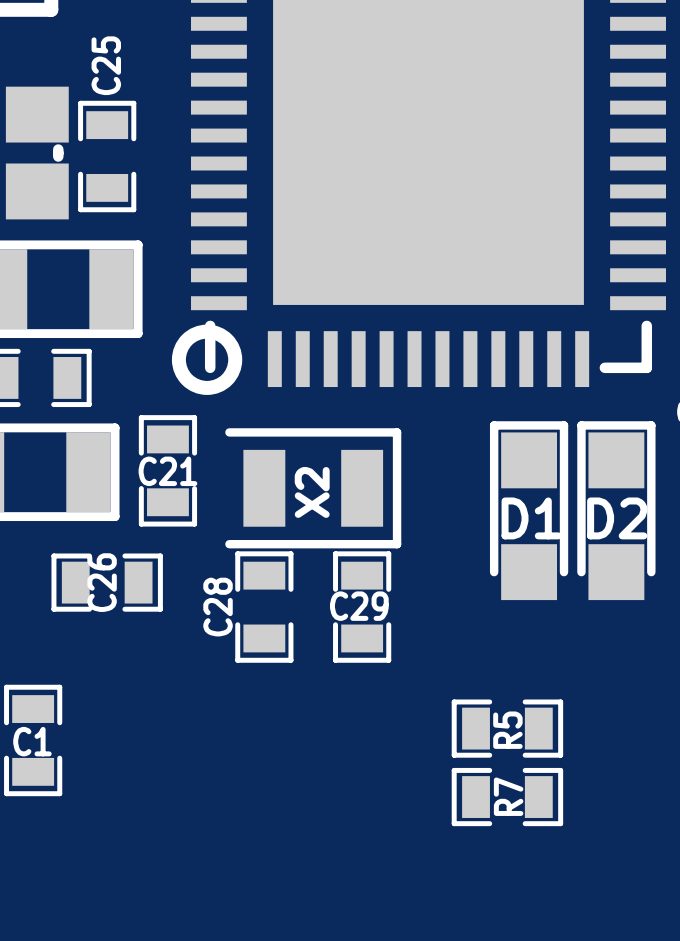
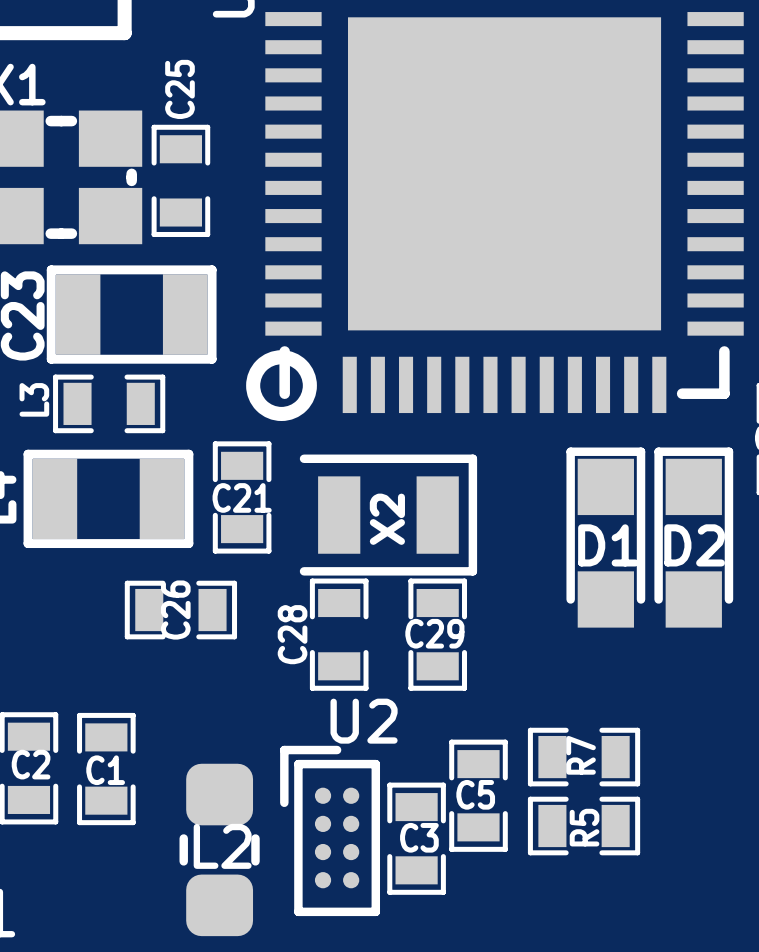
R5 name: R5 (507, 730) -> R7 (581, 755)
C5: none -> (478, 795)
R7 name: R7 (508, 796) -> R5 (584, 827)
U2: none -> (330, 830)
C3: none -> (416, 838)
L2: none -> (219, 849)

